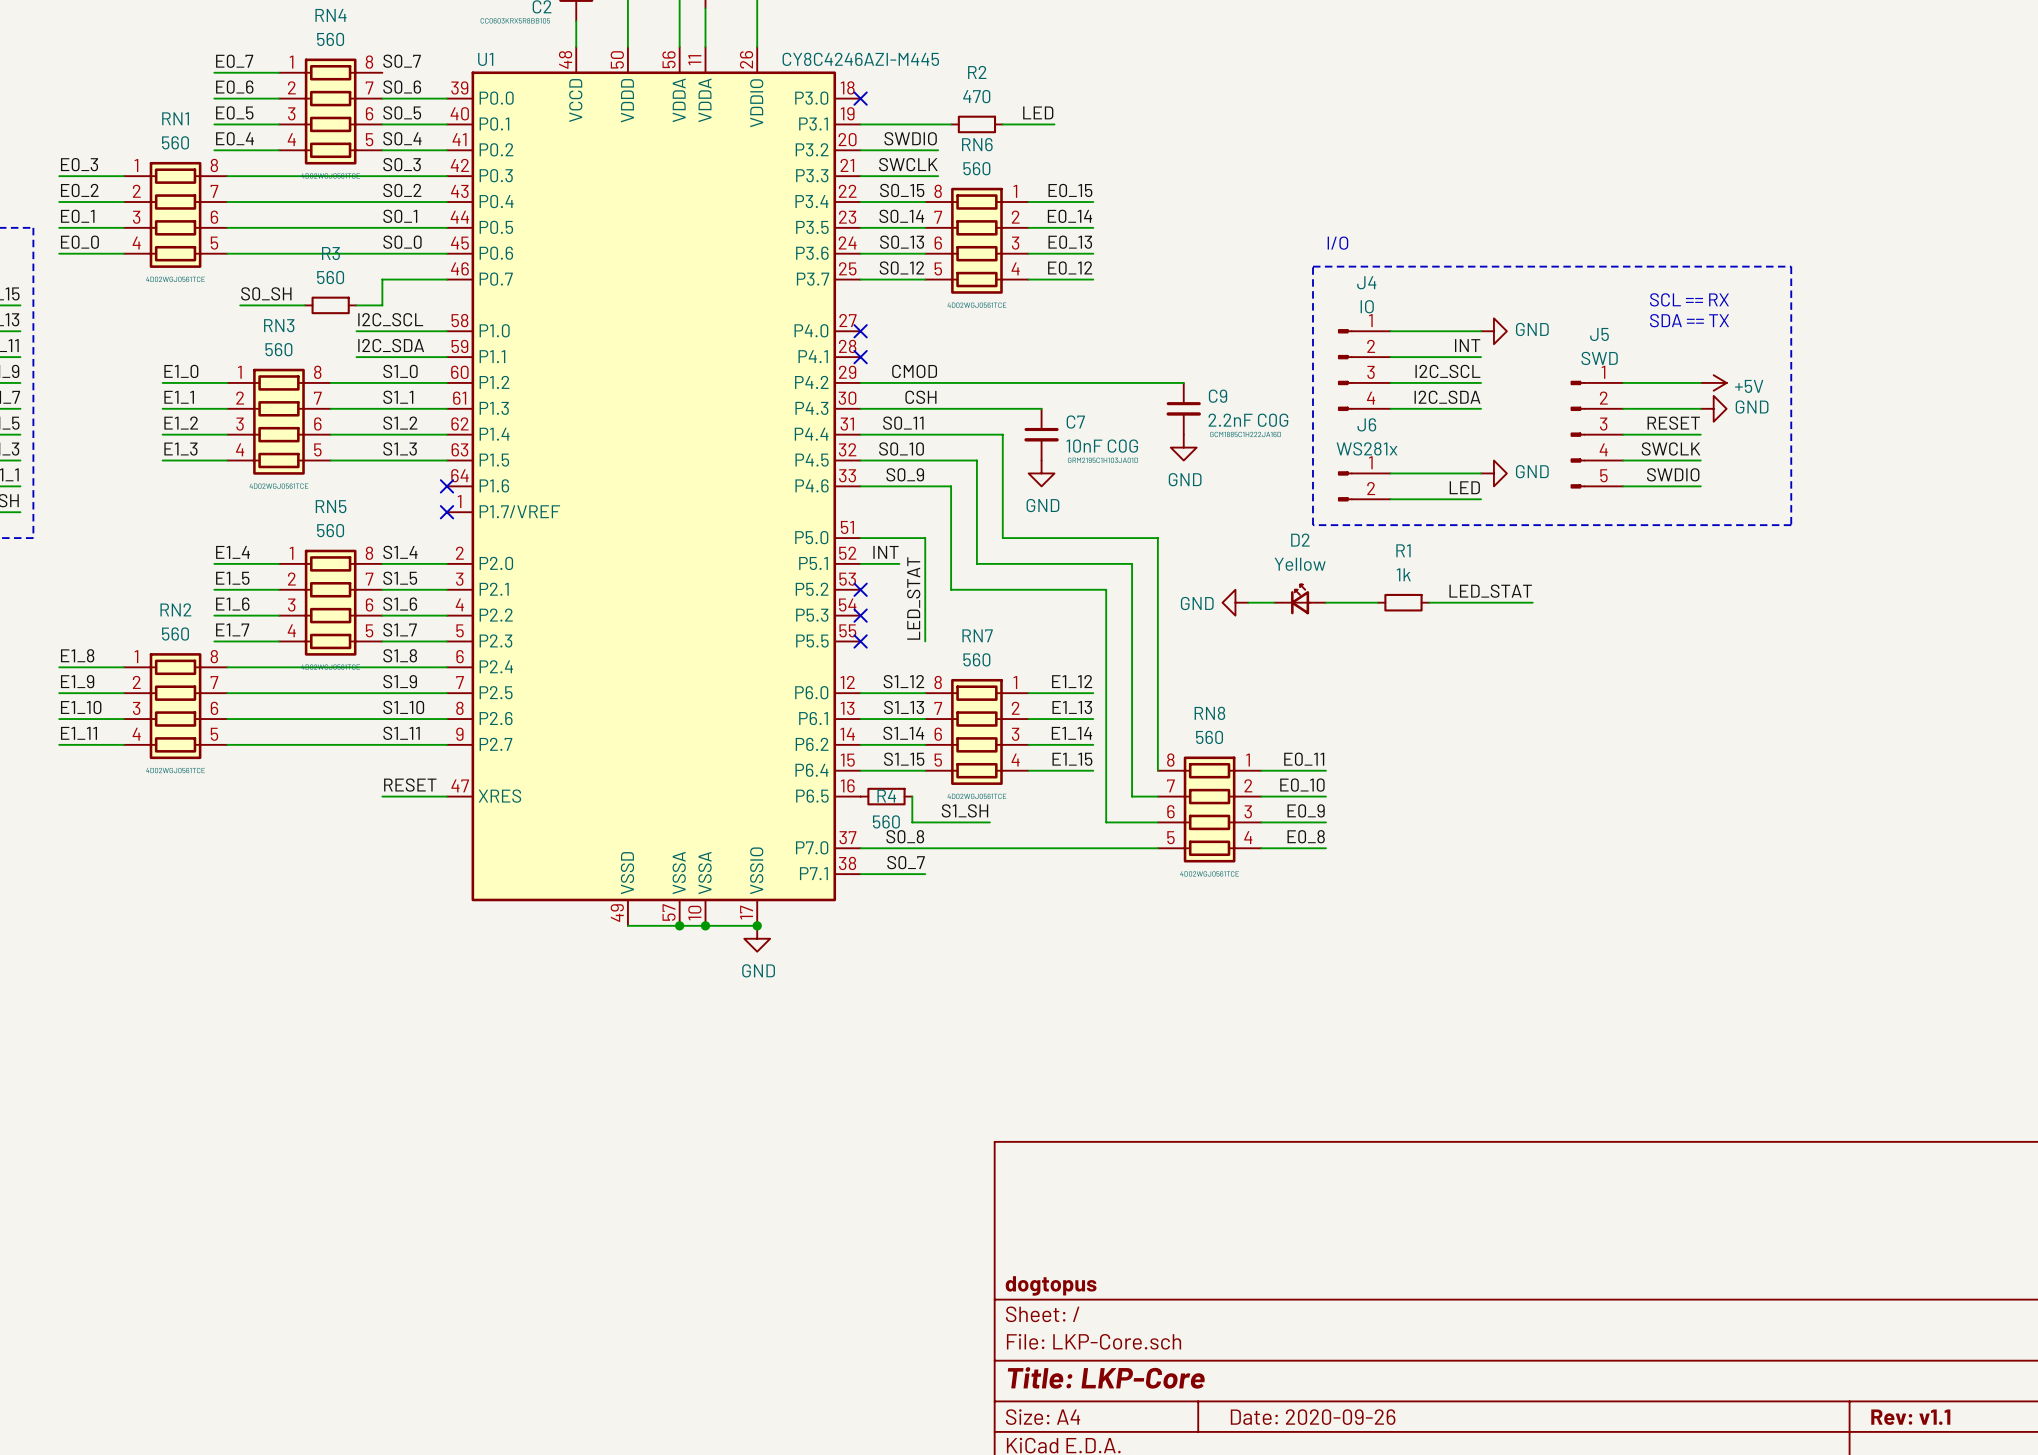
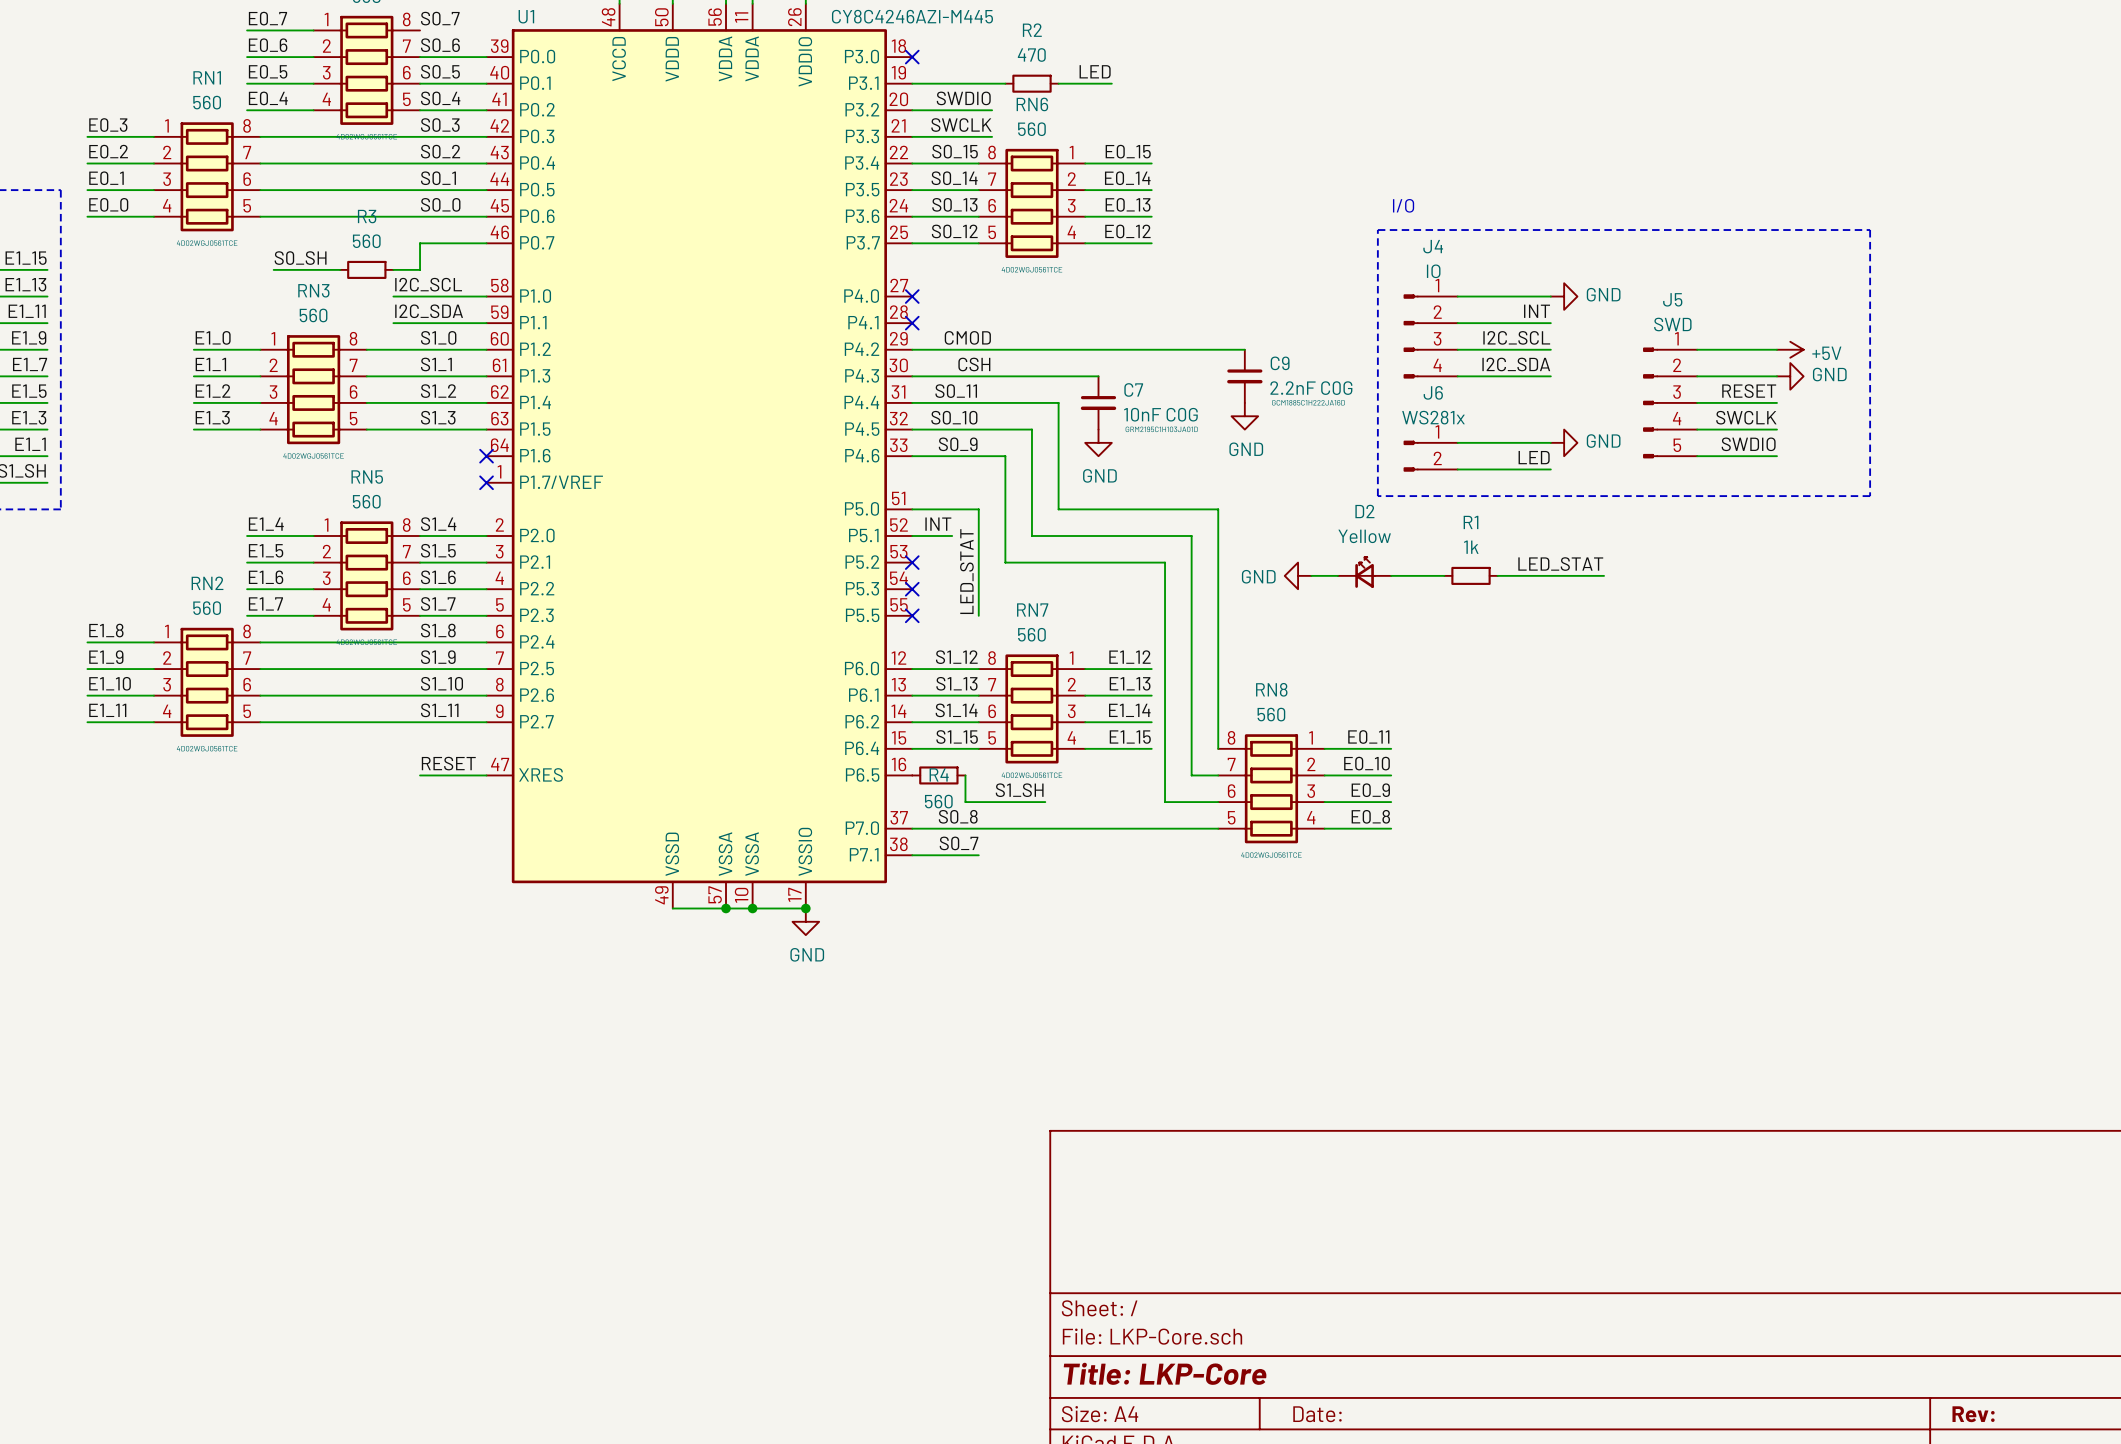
text: SCL == RX (1689, 299) -> none
text: SDA == TX (1689, 320) -> none
title block: dogtopus (1051, 1285) -> none
title block: Date: 2020-09-26 (1313, 1417) -> Date: (1317, 1414)
title block: Rev: v1.1 (1910, 1417) -> Rev: (1973, 1414)

